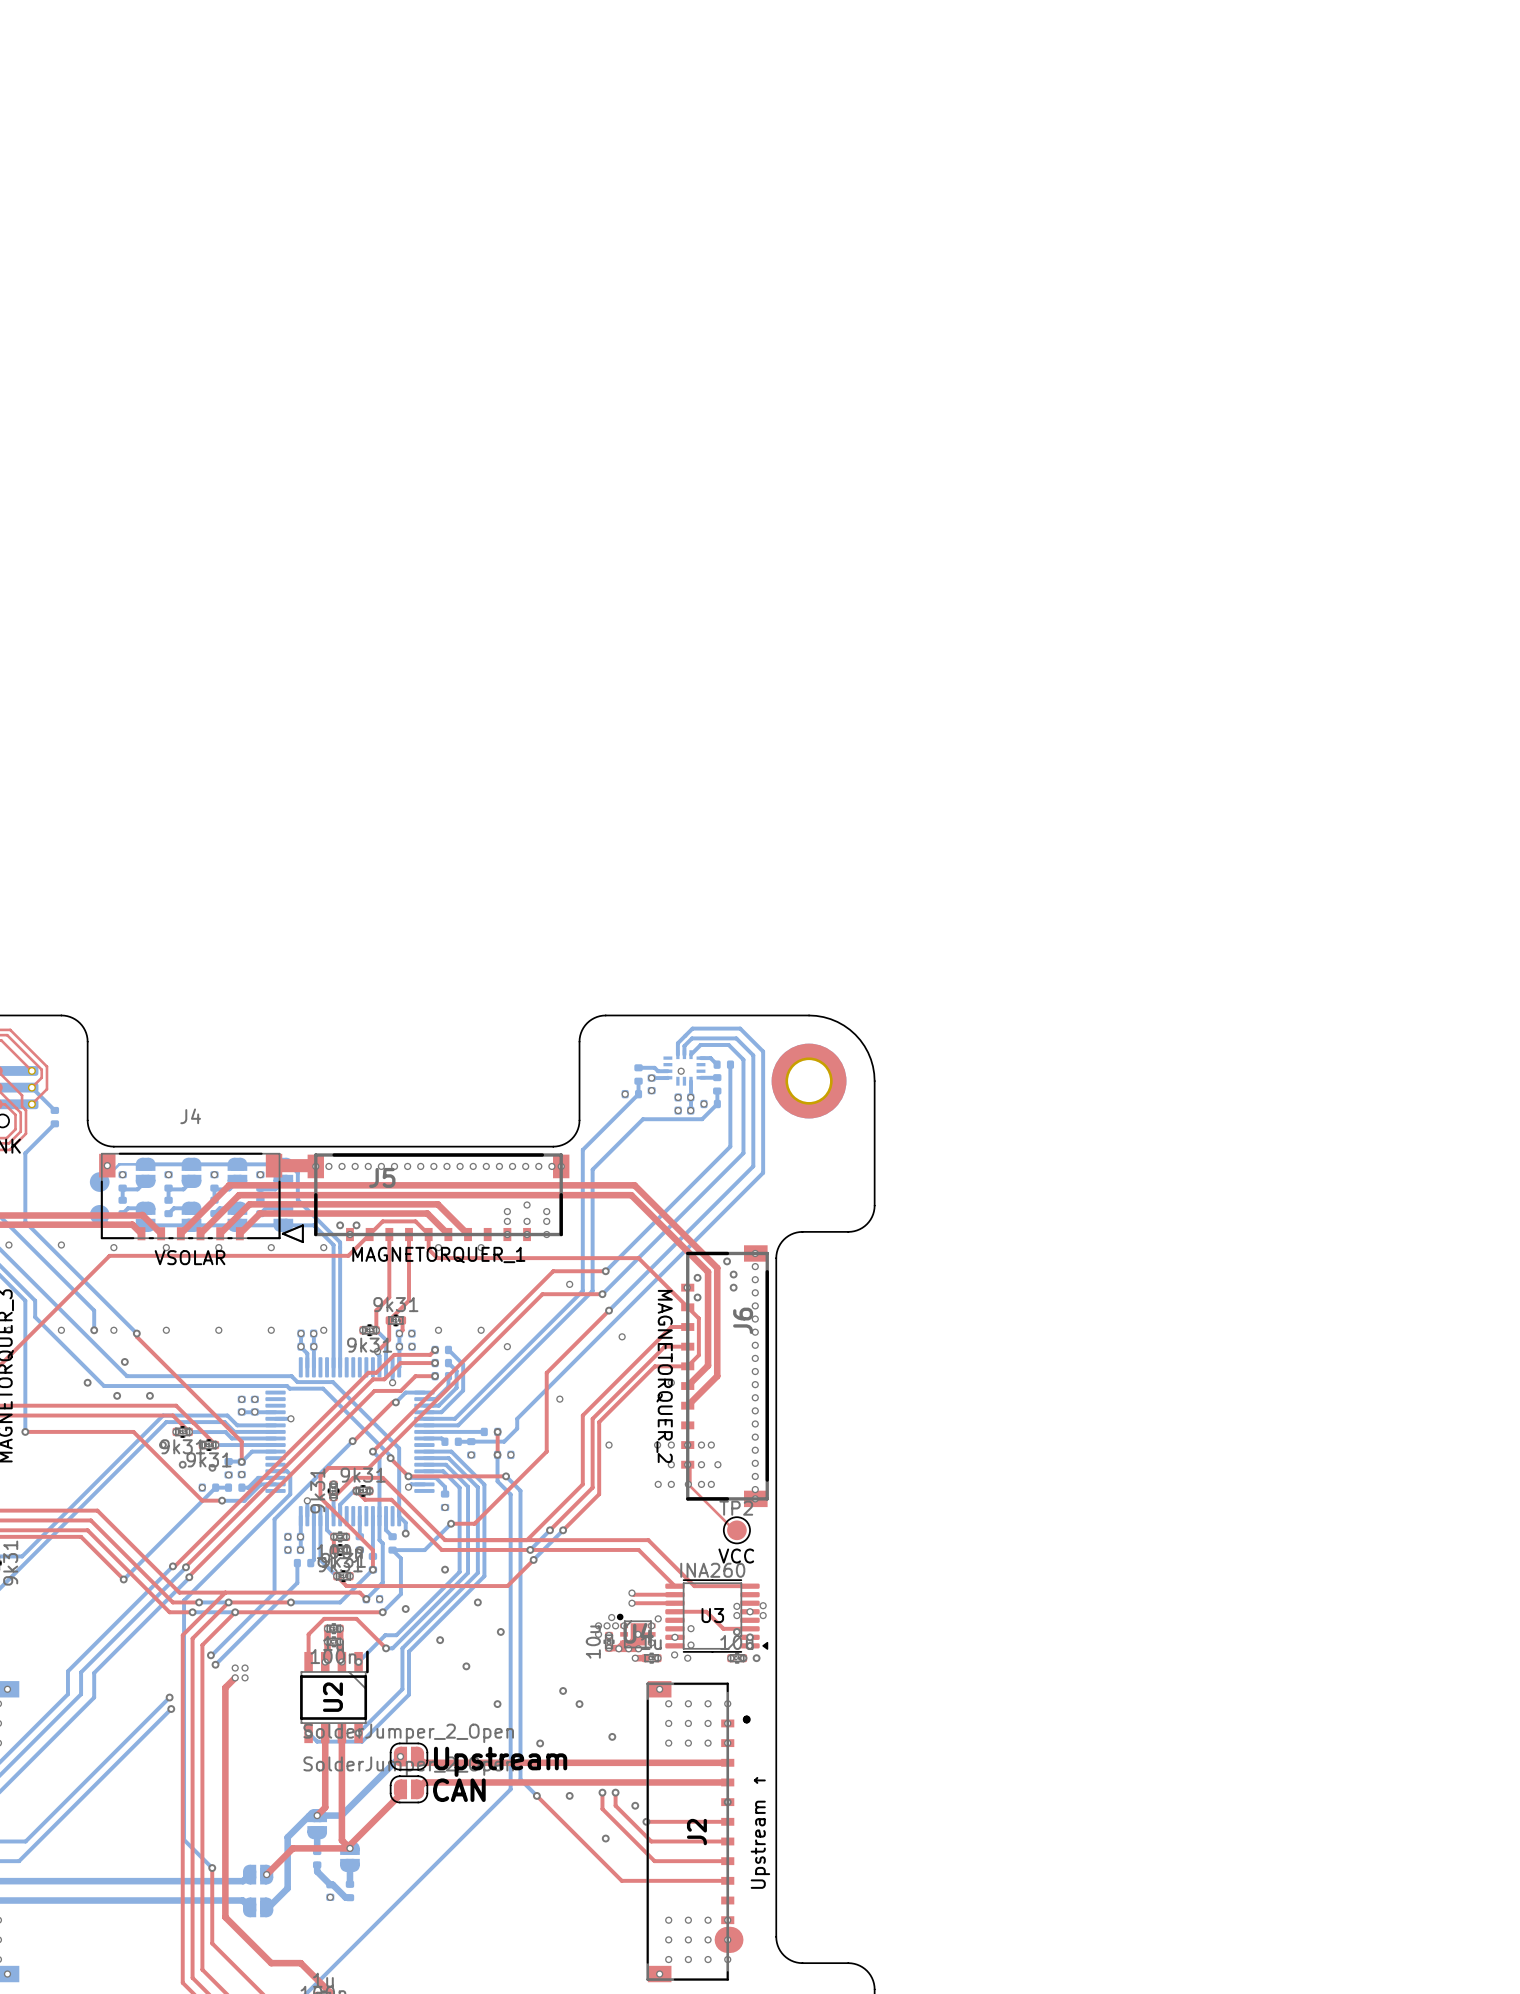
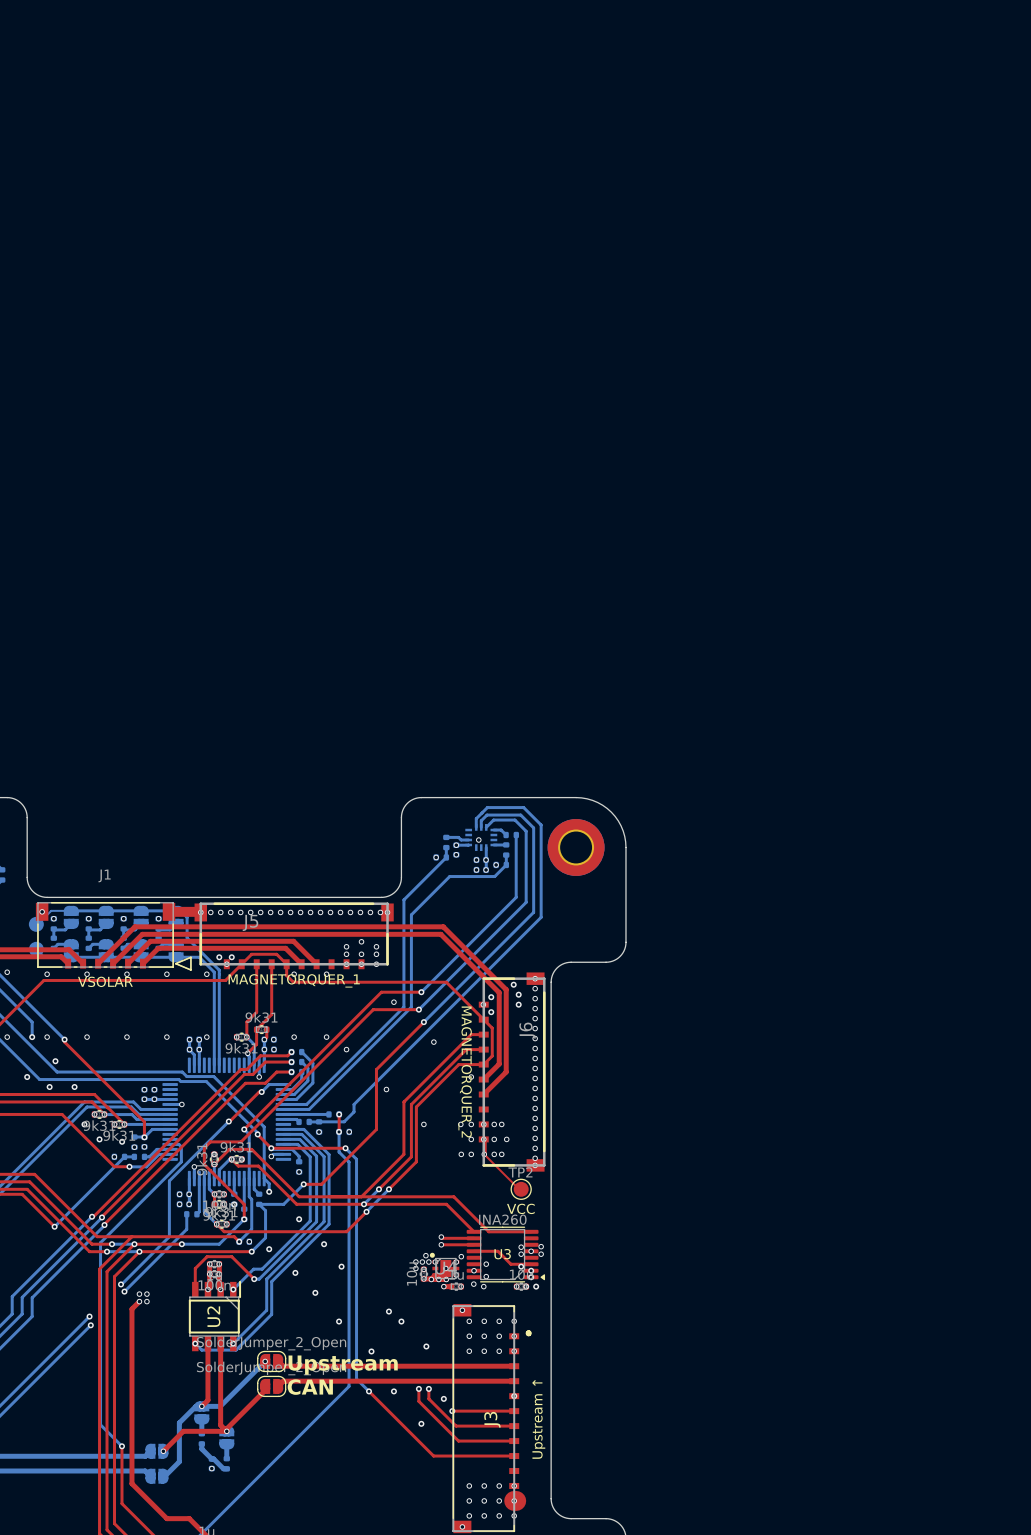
J4 name: J4 (190, 1116) -> J1 (104, 875)
J2 name: J2 (696, 1832) -> J3 (492, 1419)

